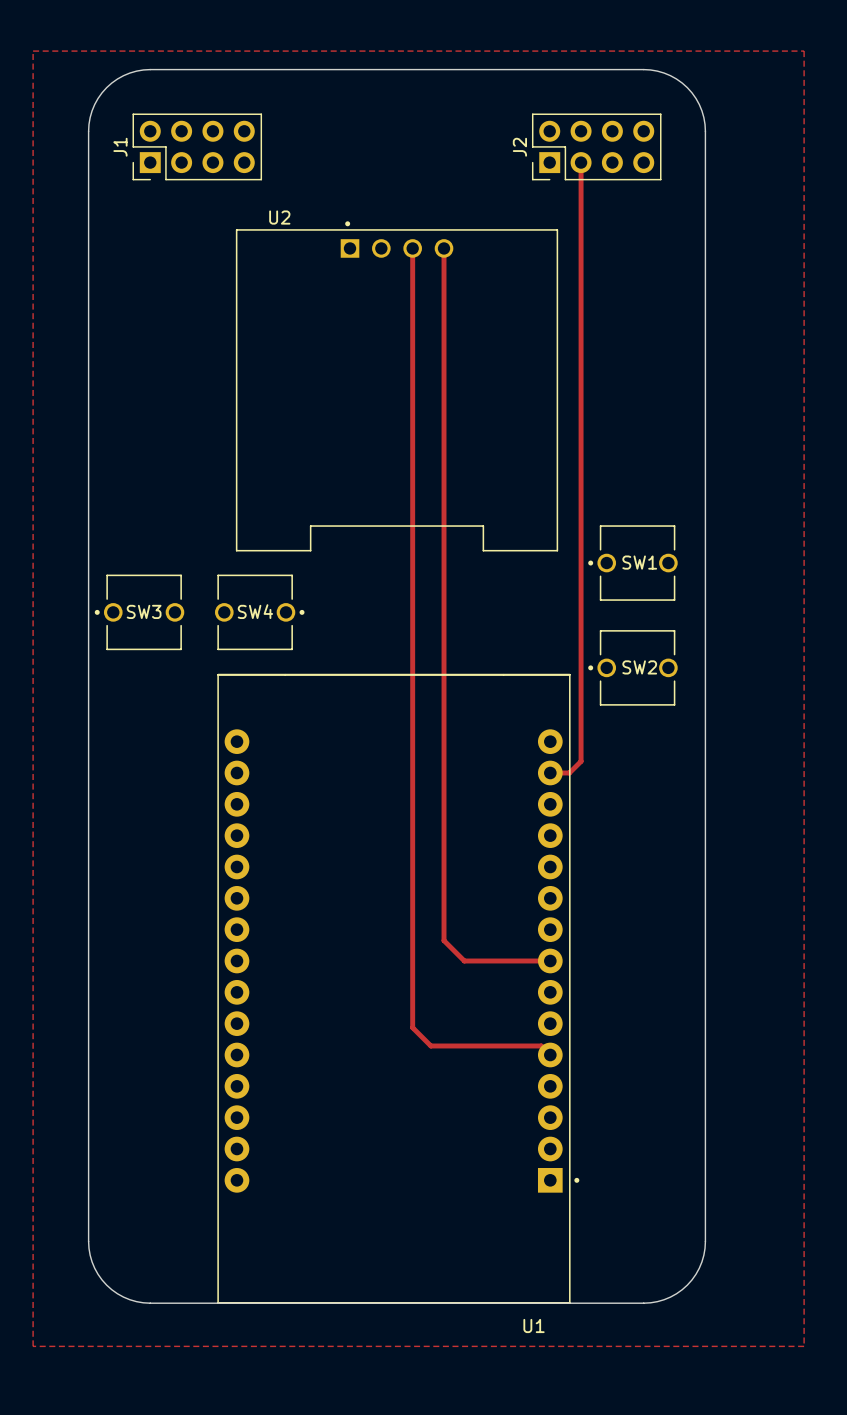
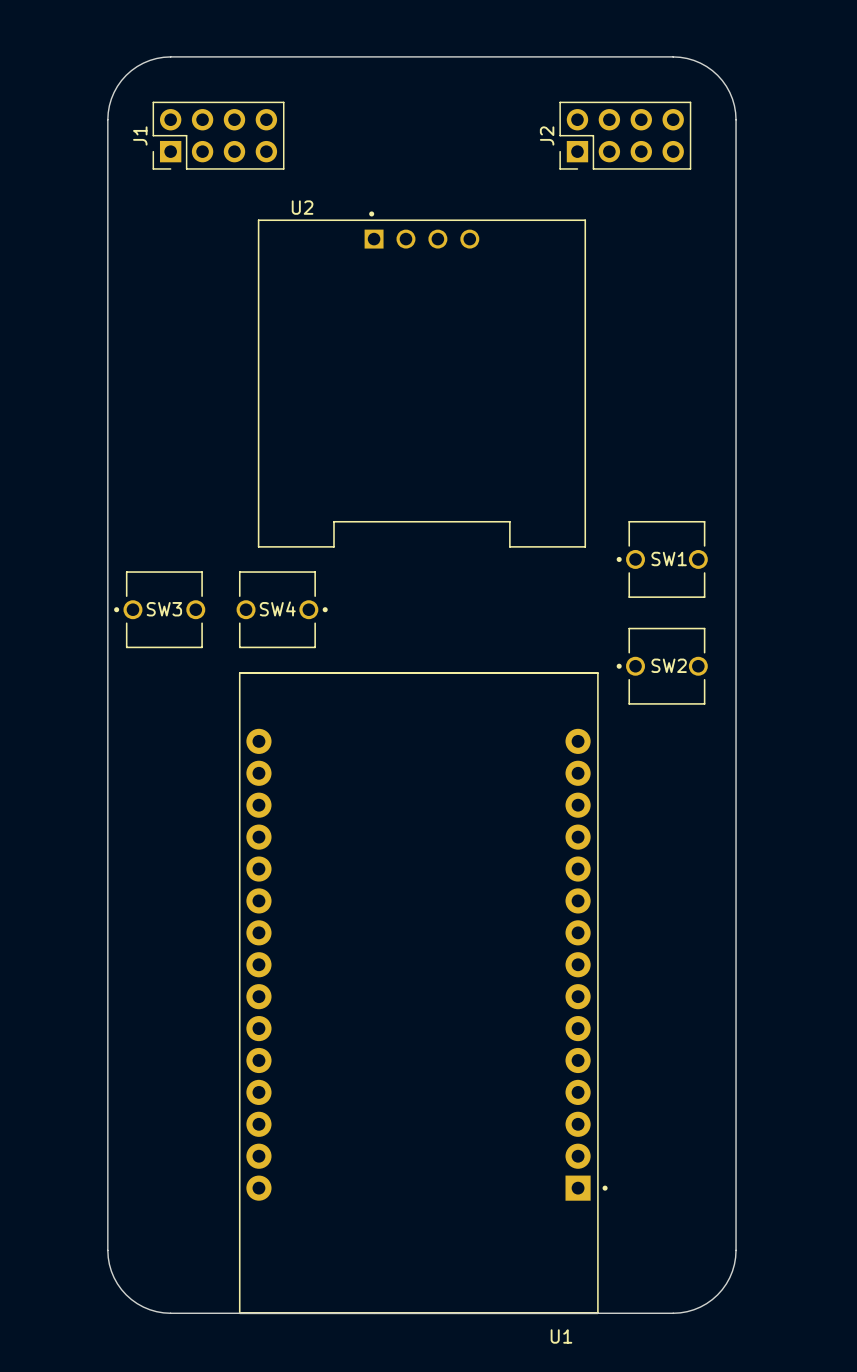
zone outline: (33, 51) (804, 51) (804, 1346) (33, 1346) (33, 51) -> none
track: (581, 162) (581, 761) (569, 772) (550, 772) -> none
track: (412, 248) (412, 1027) (430, 1045) (541, 1045) (550, 1054) -> none
track: (444, 248) (444, 940) (464, 960) (550, 960) -> none

